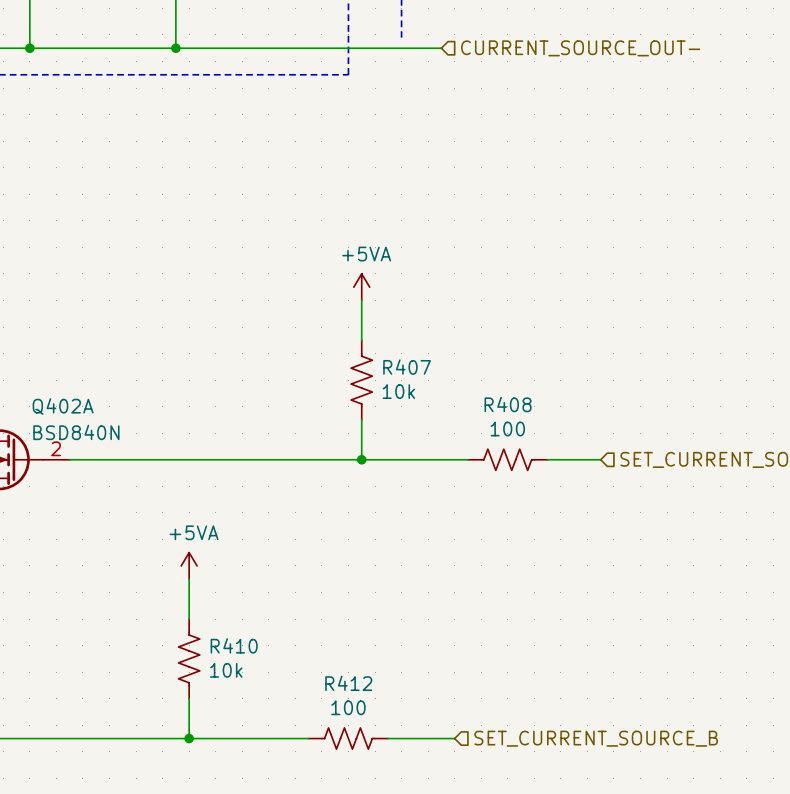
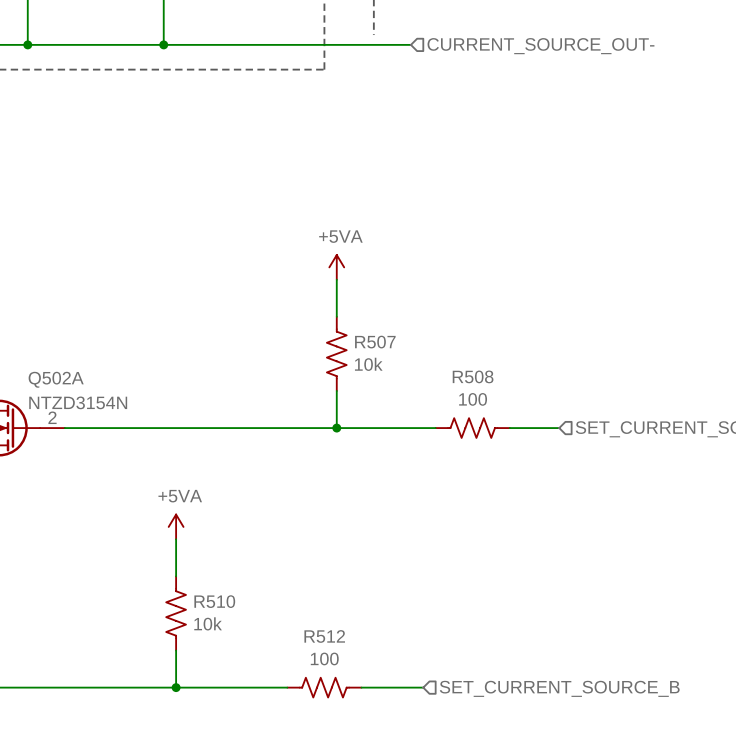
R407 name: R407 (407, 367) -> R507 (375, 342)
R408 name: R408 (508, 404) -> R508 (473, 376)
Q402A name: Q402A (63, 406) -> Q502A (56, 379)
Q402A value: BSD840N (76, 432) -> NTZD3154N (78, 402)
R410 name: R410 (234, 645) -> R510 (214, 601)
R412 name: R412 (348, 683) -> R512 (324, 636)

